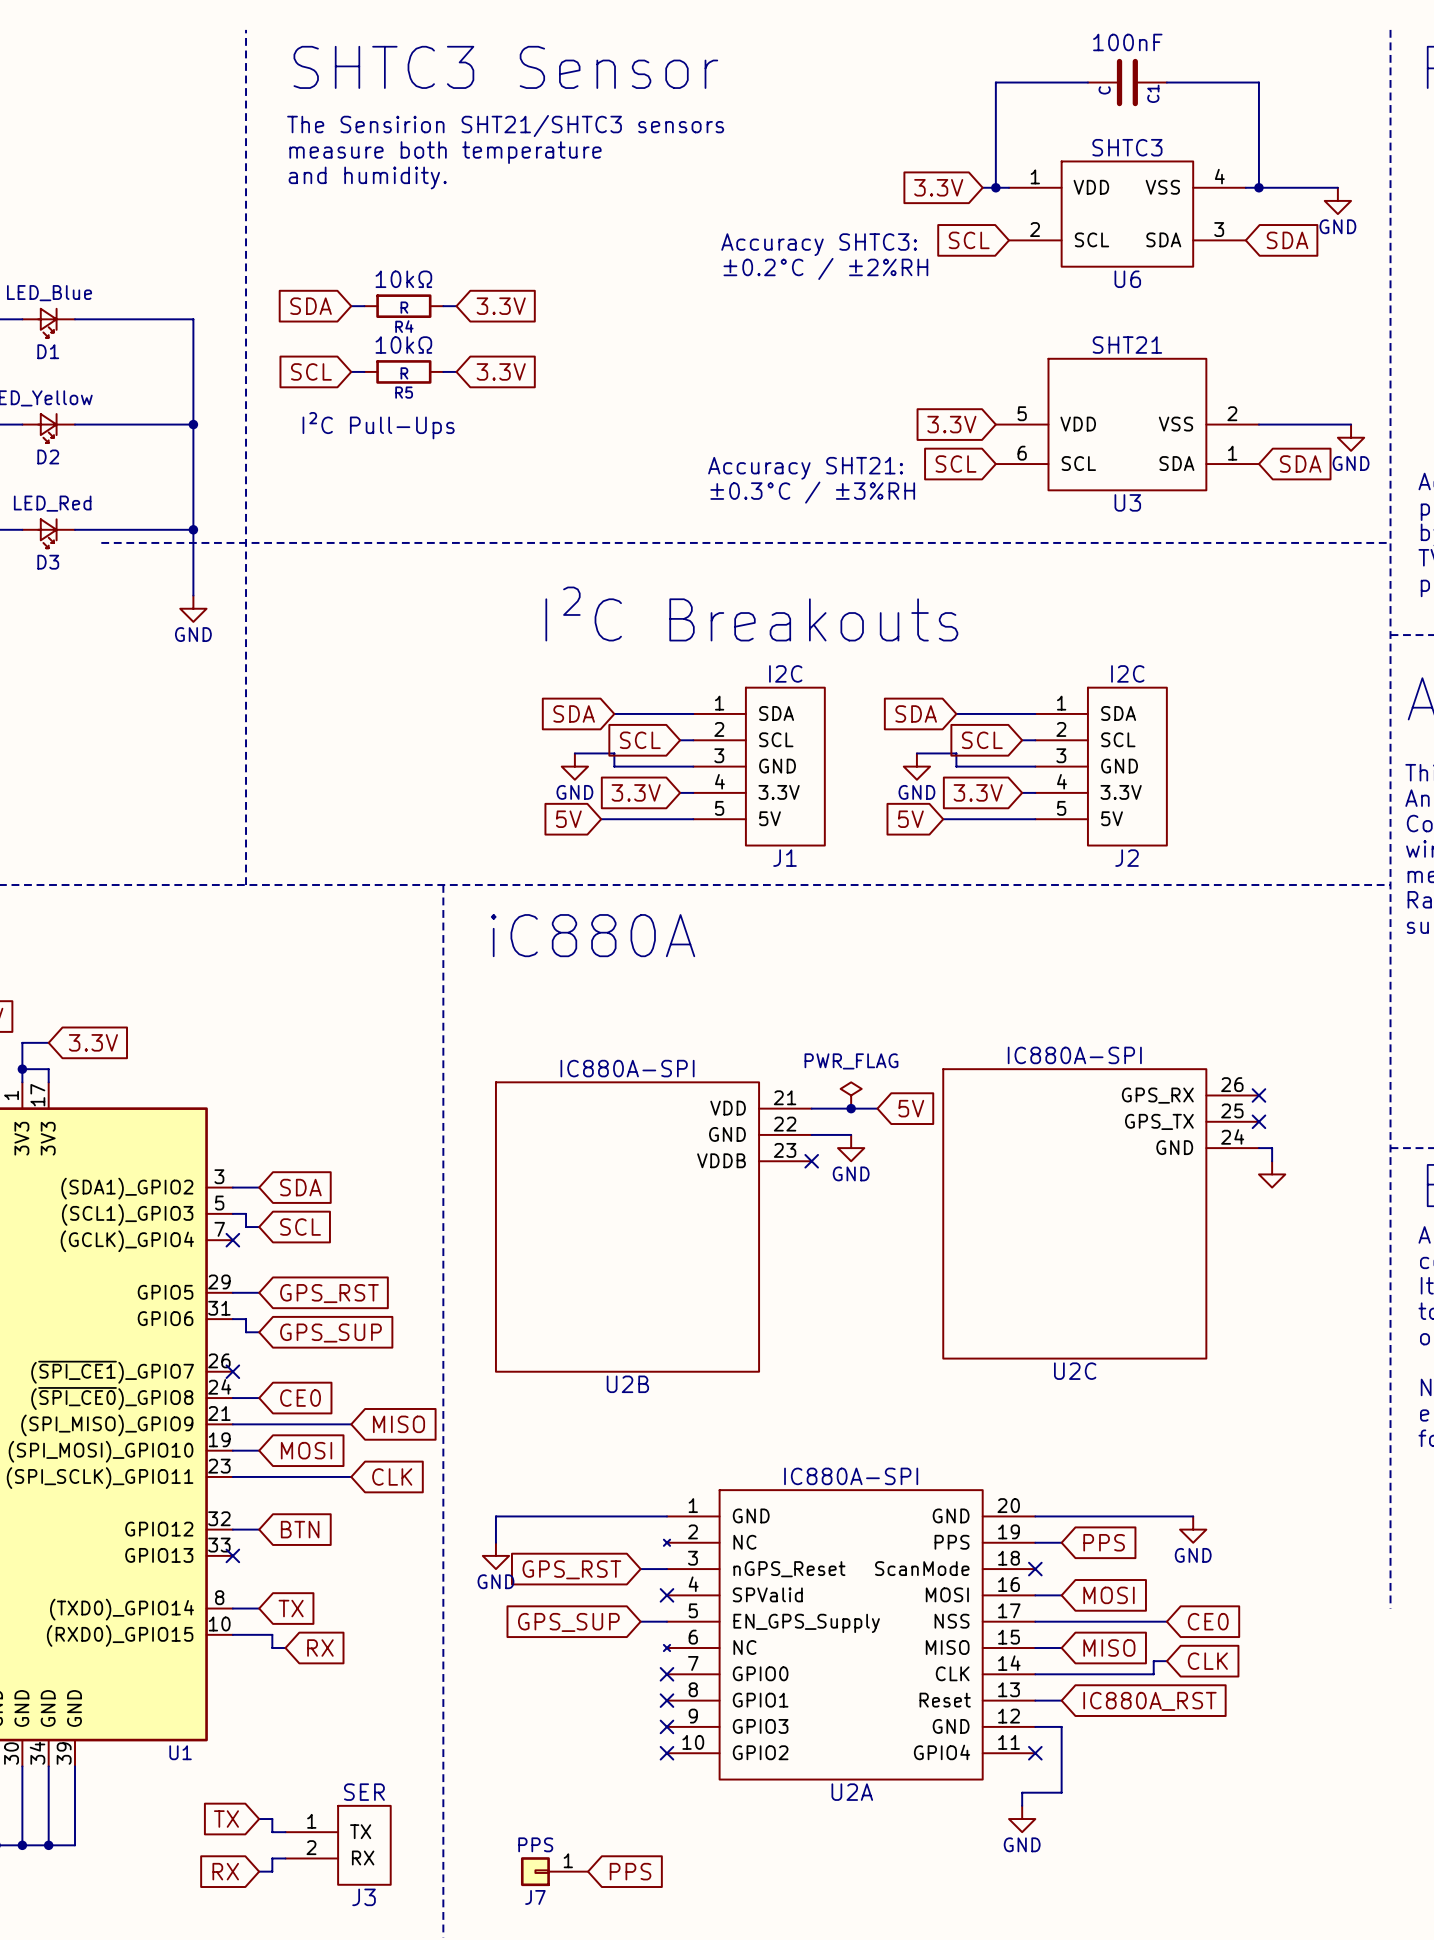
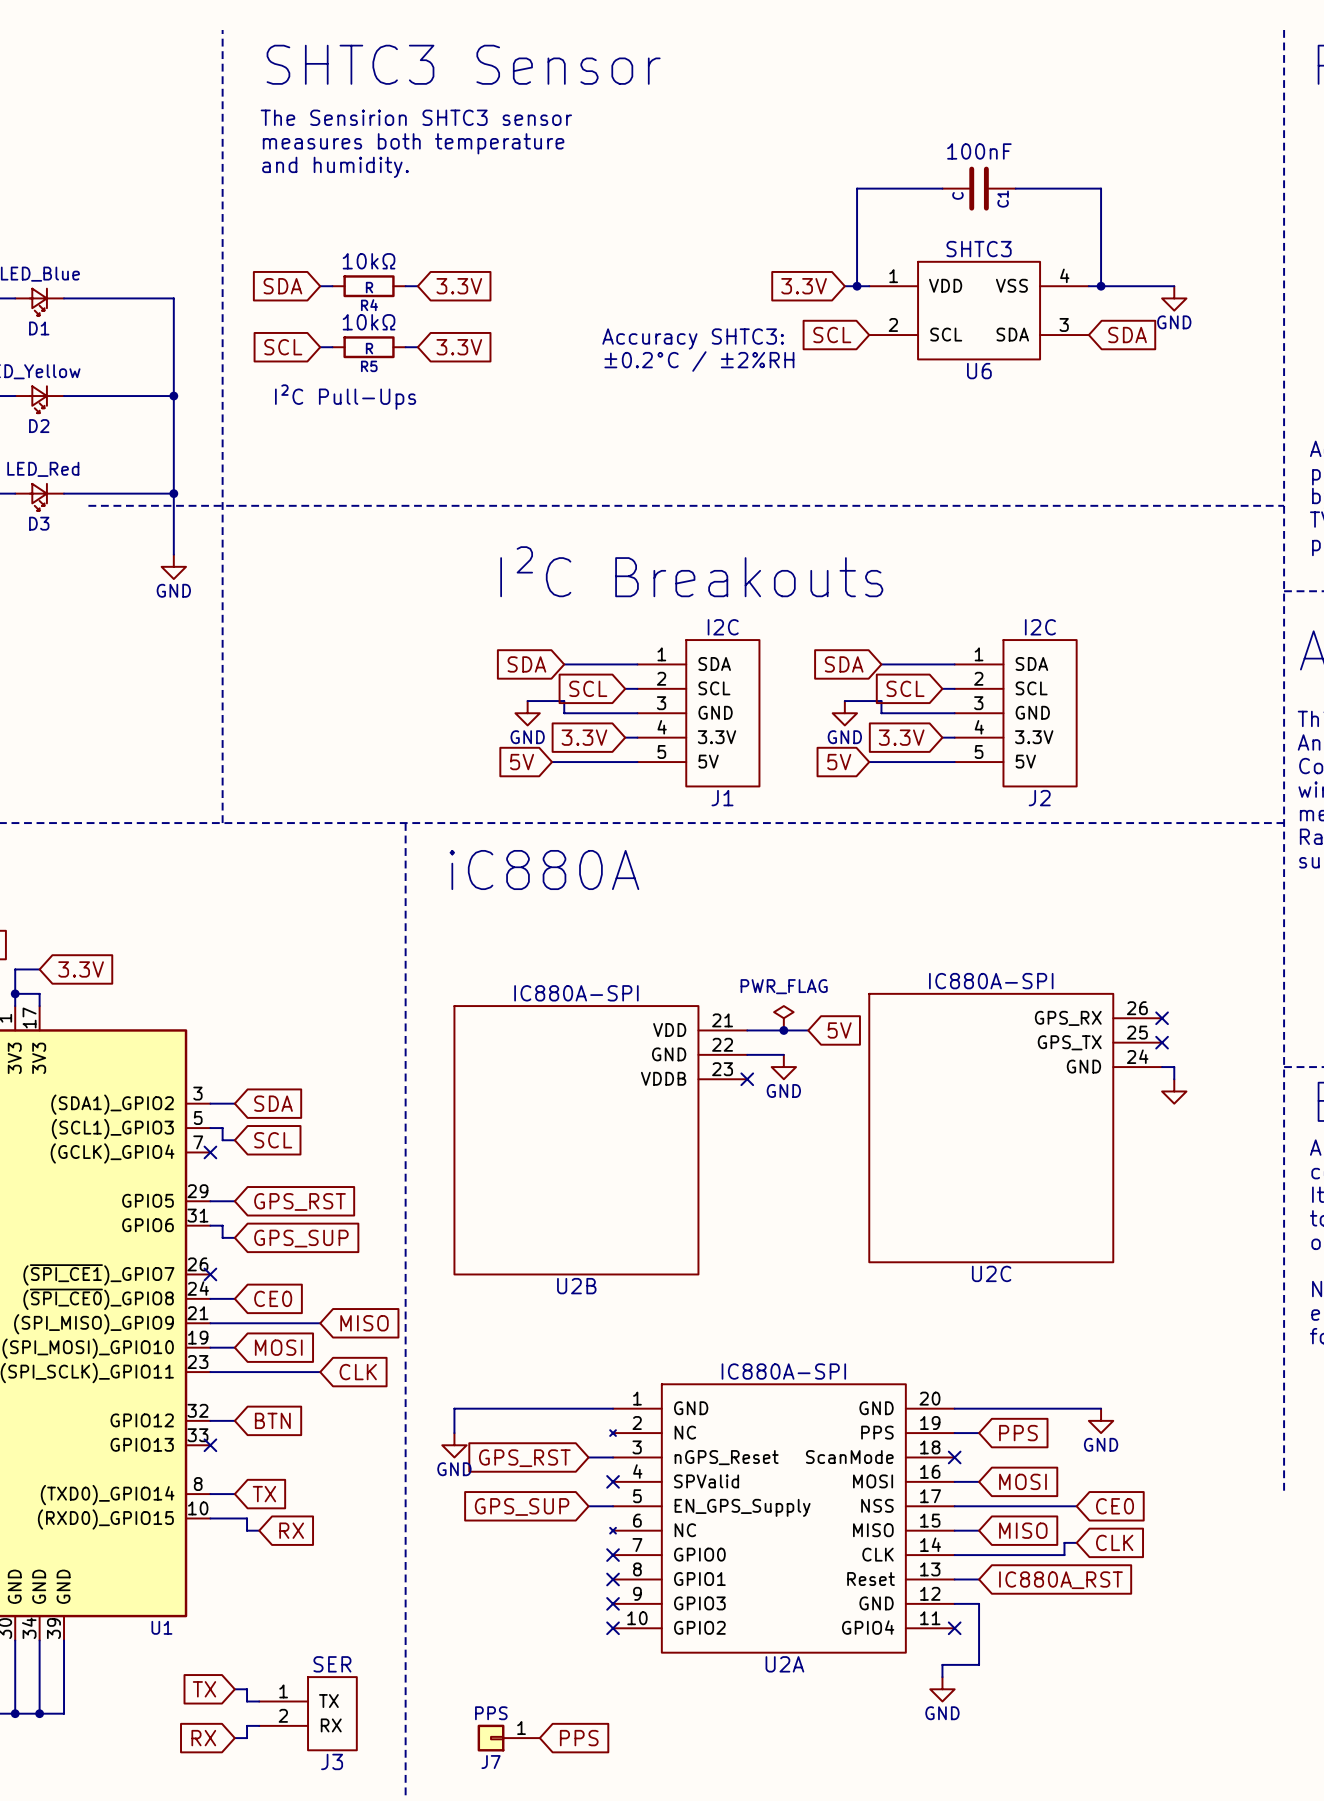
wire: (1087, 82) (995, 82) (995, 187) -> (942, 188) (857, 188) (857, 286)
C1 position: (1127, 82) -> (979, 188)
wire: (1166, 82) (1258, 82) (1258, 187) -> (1015, 188) (1101, 188) (1101, 286)
text: The Sensirion SHT21/SHTC3 sensors (505, 126) -> The Sensirion SHTC3 sensor (416, 117)
text: measure both temperature (445, 152) -> measures both temperature (413, 143)
global label: 3.3V (938, 187) -> none
wire: (982, 187) (1009, 187) -> (844, 286) (869, 286)
junction: (995, 187) -> none
wire: (1245, 187) (1337, 187) -> (1088, 286) (1174, 286)
junction: (1258, 187) -> none
power symbol: GND (1337, 200) -> none
U6 position: (1127, 214) -> (979, 310)
global label: SCL (969, 240) -> none
global label: SDA (1287, 240) -> none
text position: Accuracy SHTC3: (819, 244) -> Accuracy SHTC3: (693, 338)
text position: ±0.2°C / ±2%RH (825, 268) -> ±0.2°C / ±2%RH (699, 361)
global label: none -> 3.3V (804, 286)
junction: none -> (857, 286)
junction: none -> (1101, 286)
power symbol: none -> GND (1174, 298)
global label: none -> SCL (832, 335)
global label: none -> SDA (1127, 335)
global label: 3.3V (951, 424) -> none
U3: SHT21 (1127, 424) -> none
wire: (1258, 424) (1351, 424) -> none
power symbol: GND (1351, 437) -> none
global label: SCL (956, 464) -> none
global label: SDA (1300, 464) -> none
text: Accuracy SHT21: (805, 468) -> none
text: ±0.3°C / ±3%RH (812, 492) -> none

